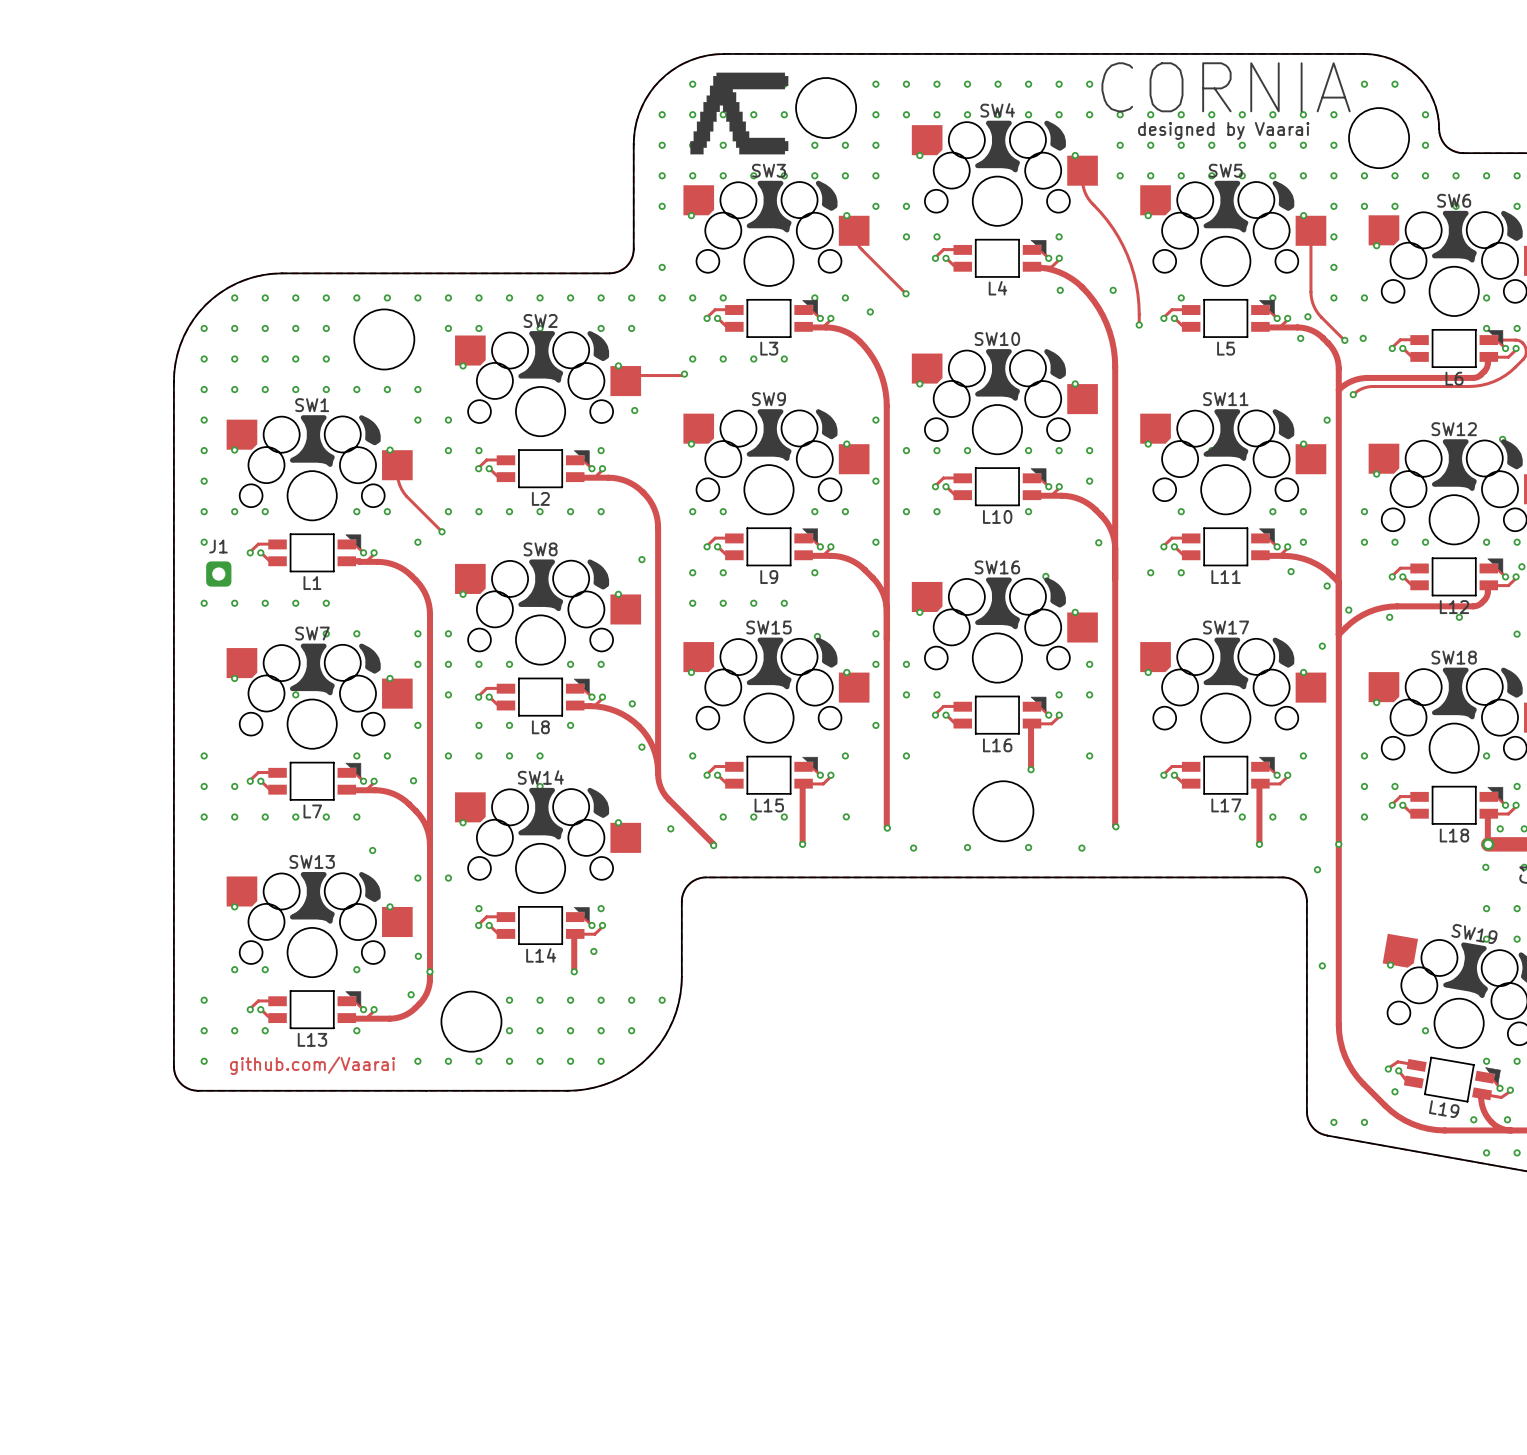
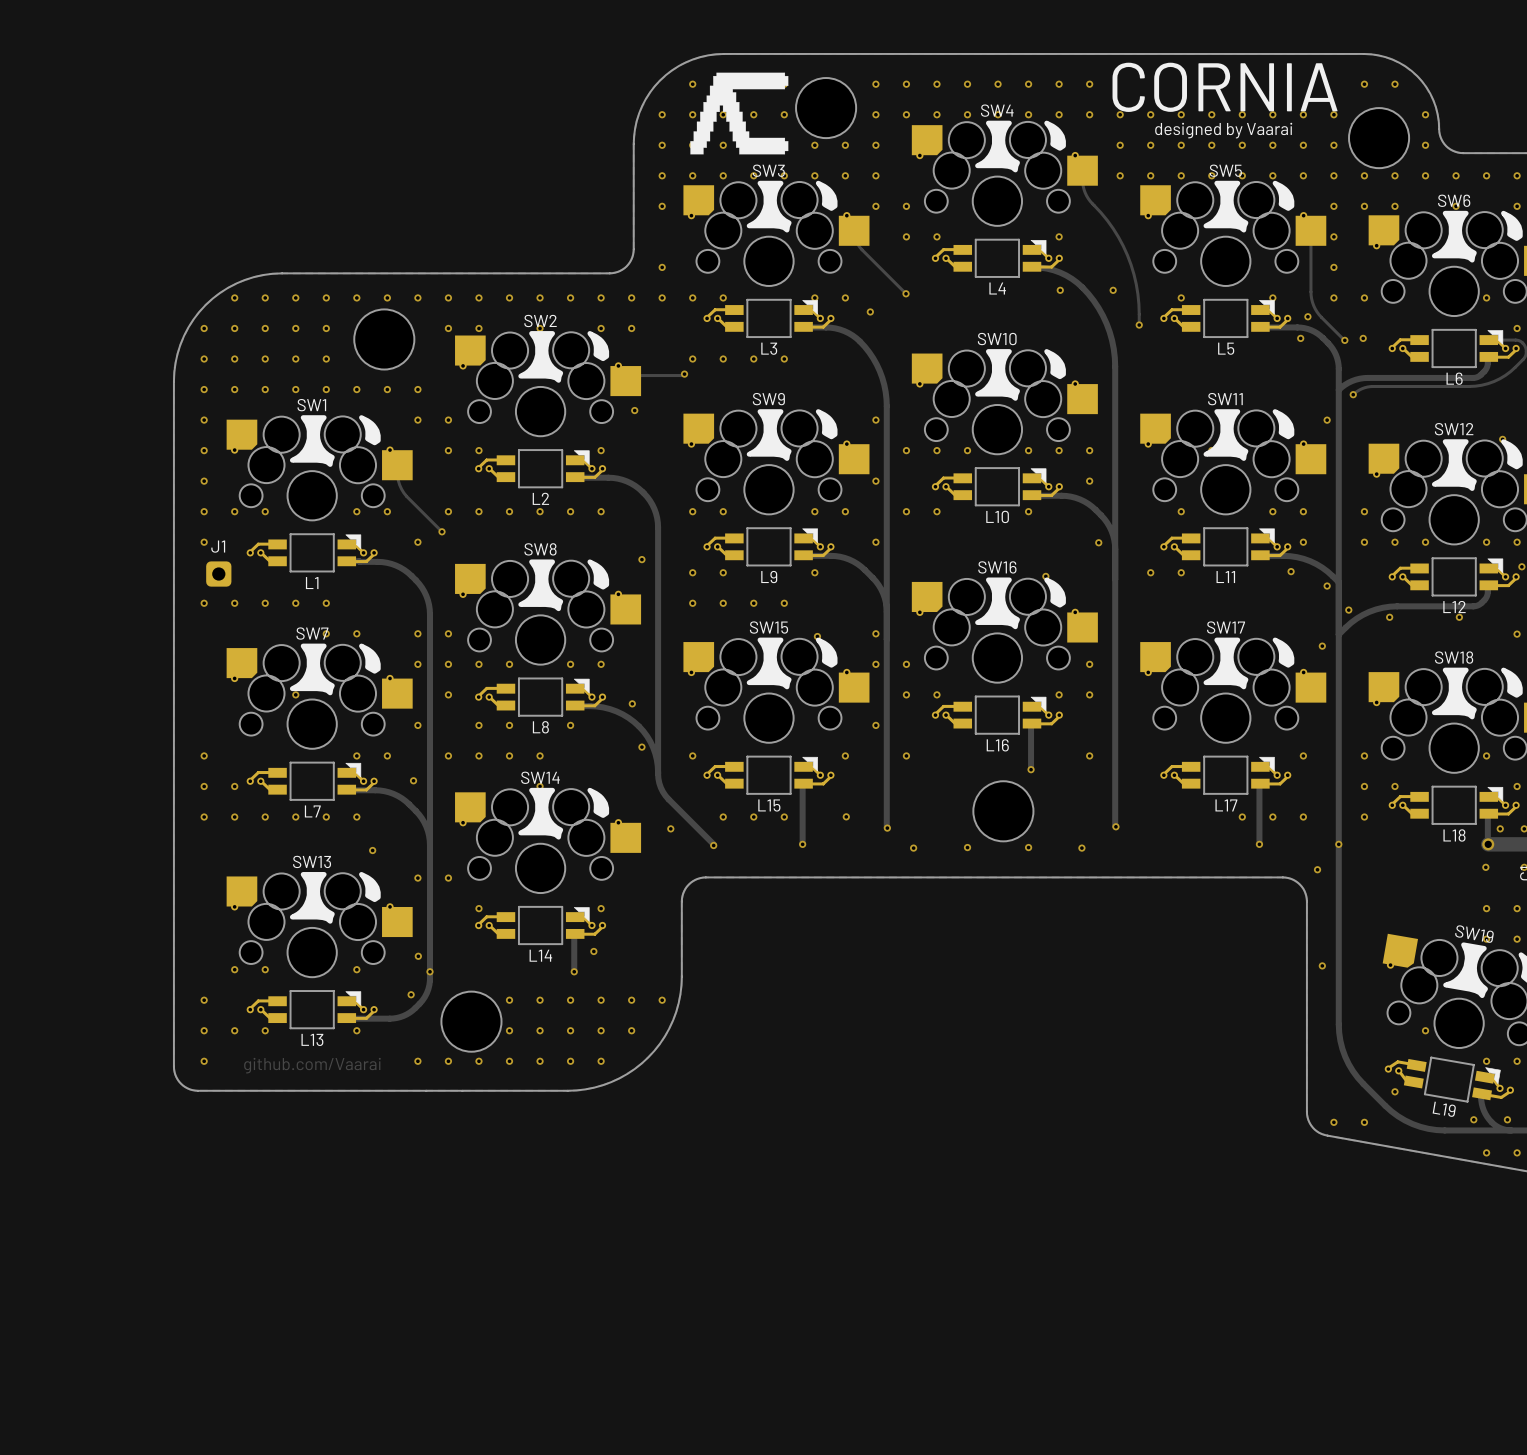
via: (1486, 328) -> none

